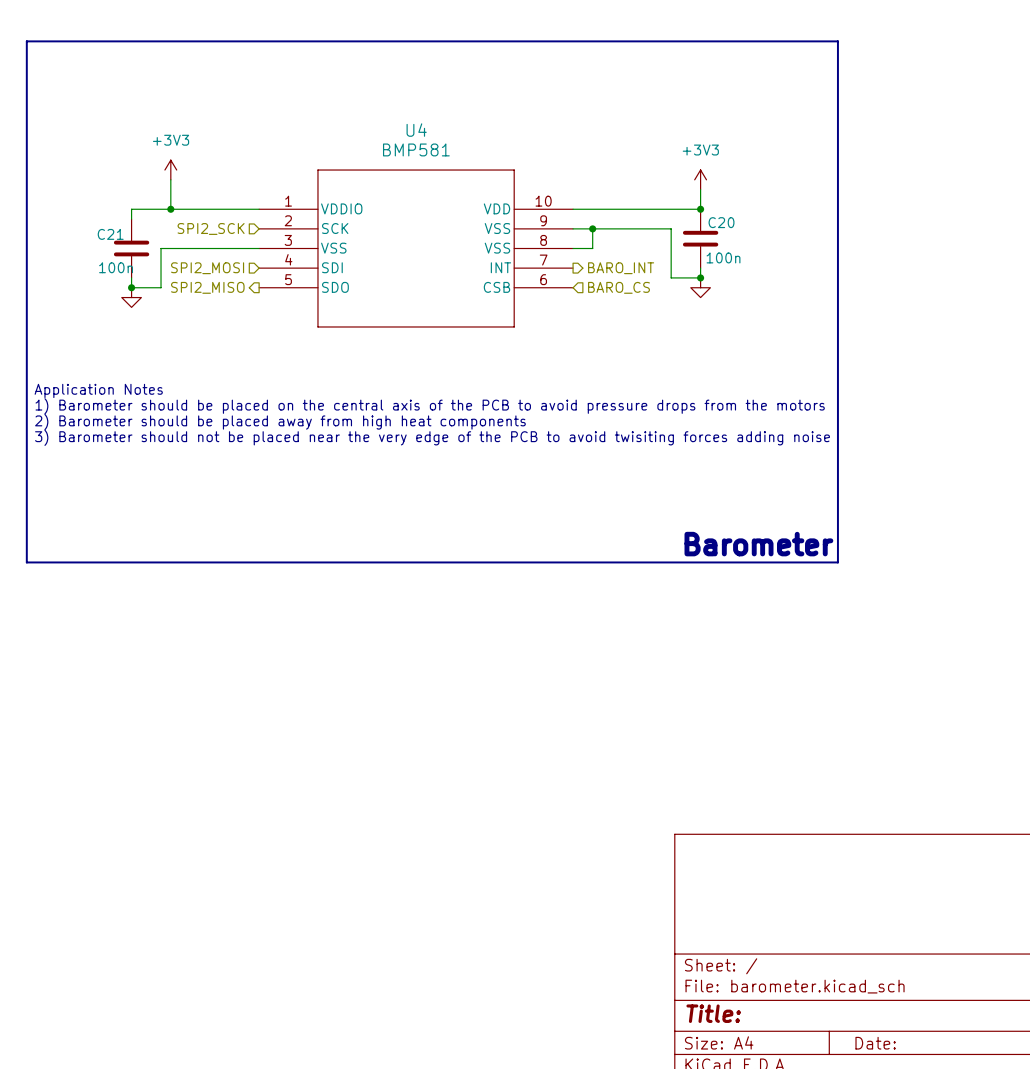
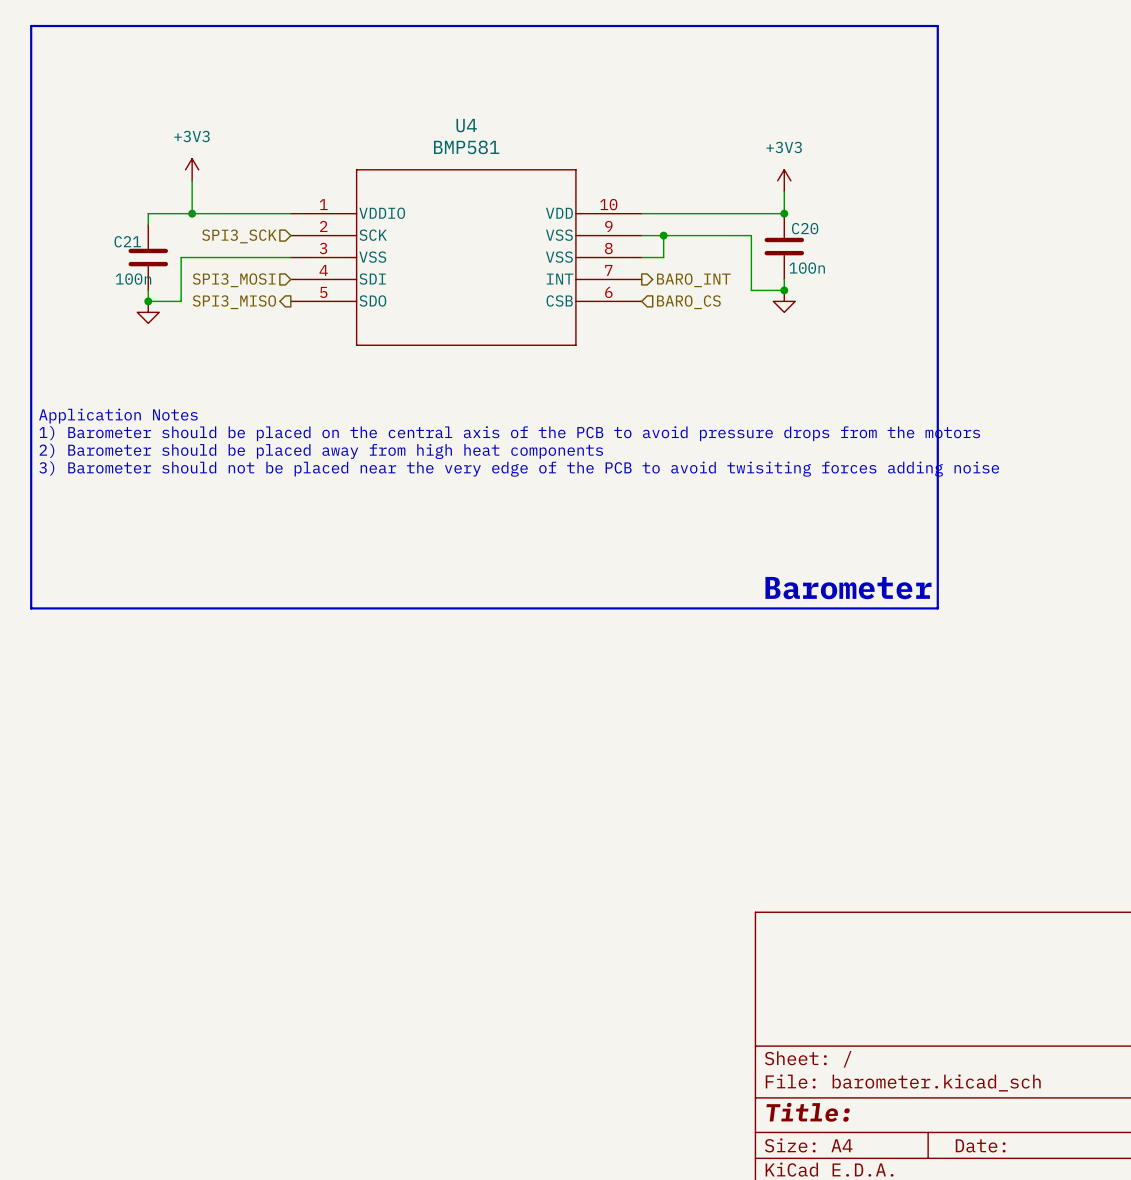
hierarchical label: SPI2_SCK (211, 228) -> SPI3_SCK (239, 236)
hierarchical label: SPI2_MOSI (207, 268) -> SPI3_MOSI (234, 280)
hierarchical label: SPI2_MISO (207, 287) -> SPI3_MISO (234, 302)

